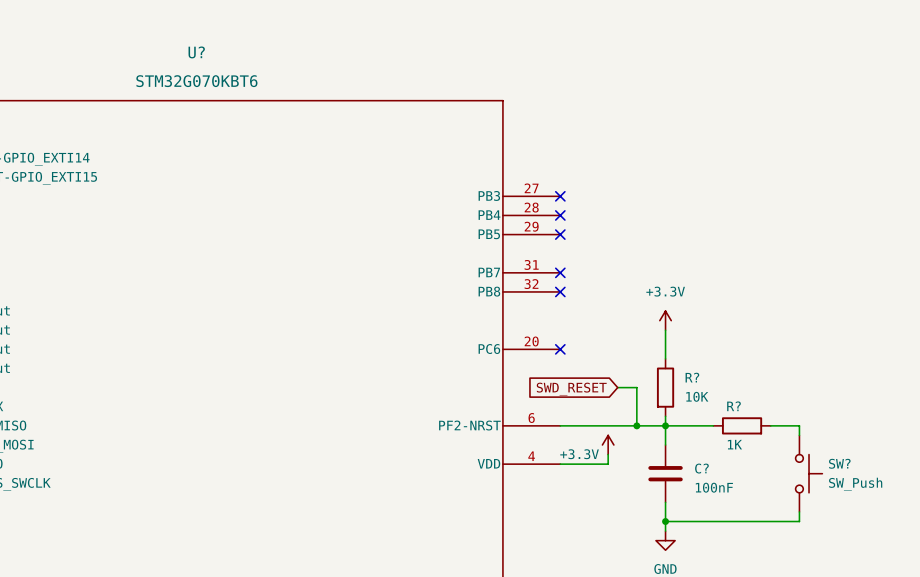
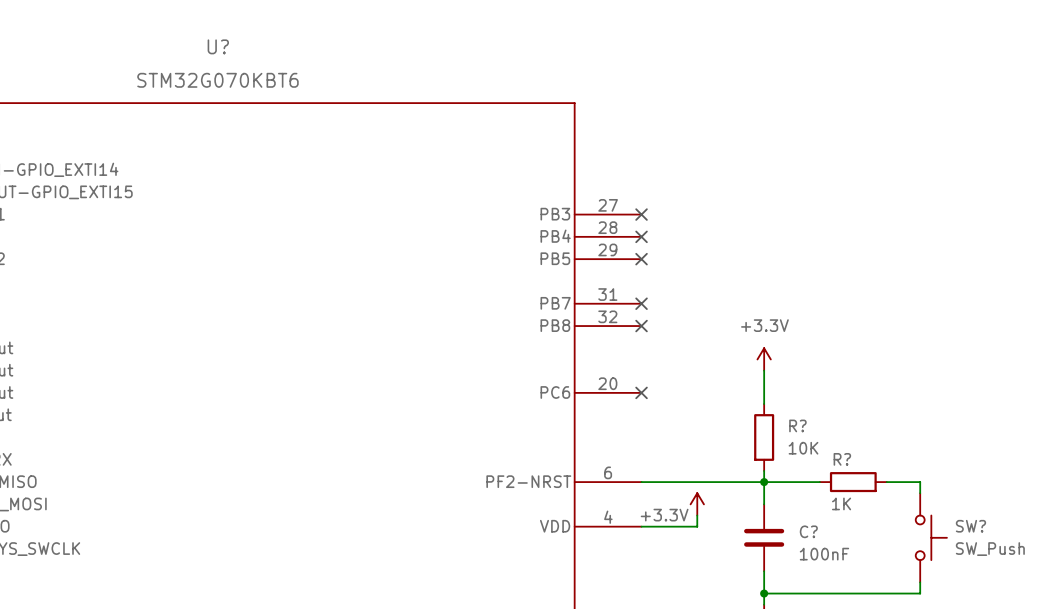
wire: (617, 387) (636, 387) (636, 425) -> none
global label: SWD_RESET (571, 389) -> none
junction: (636, 425) -> none

